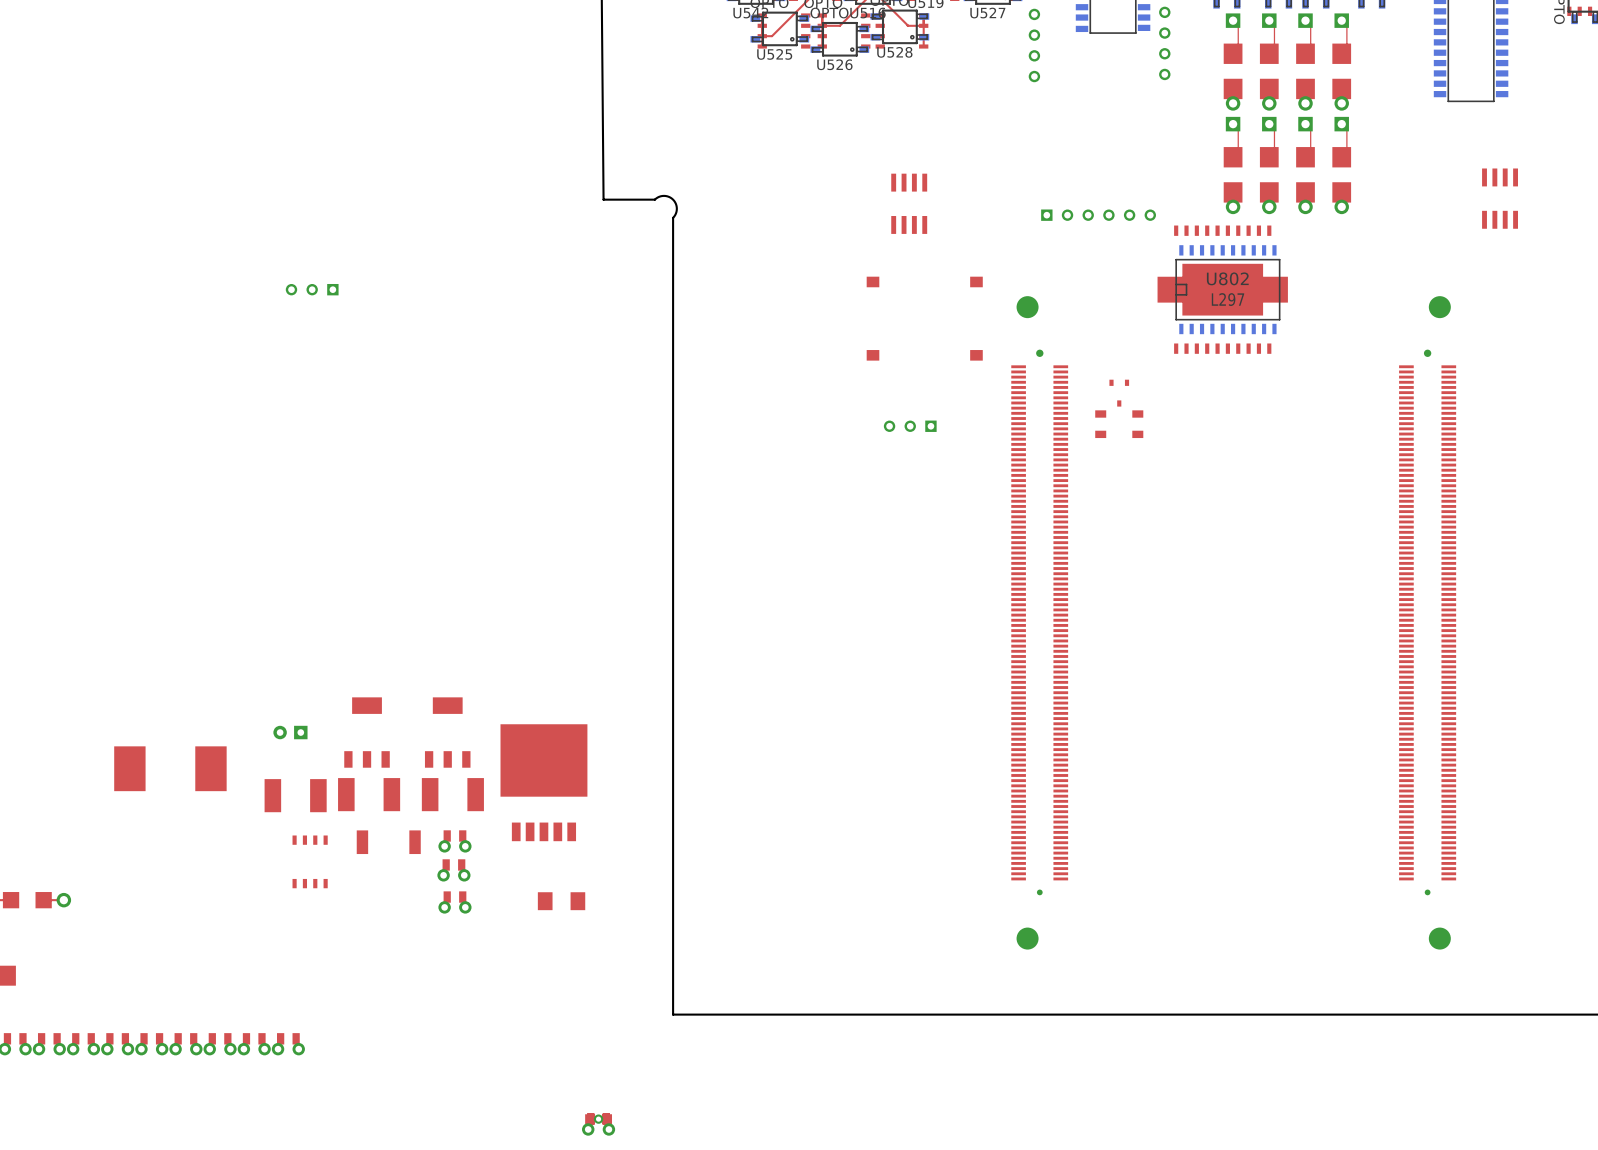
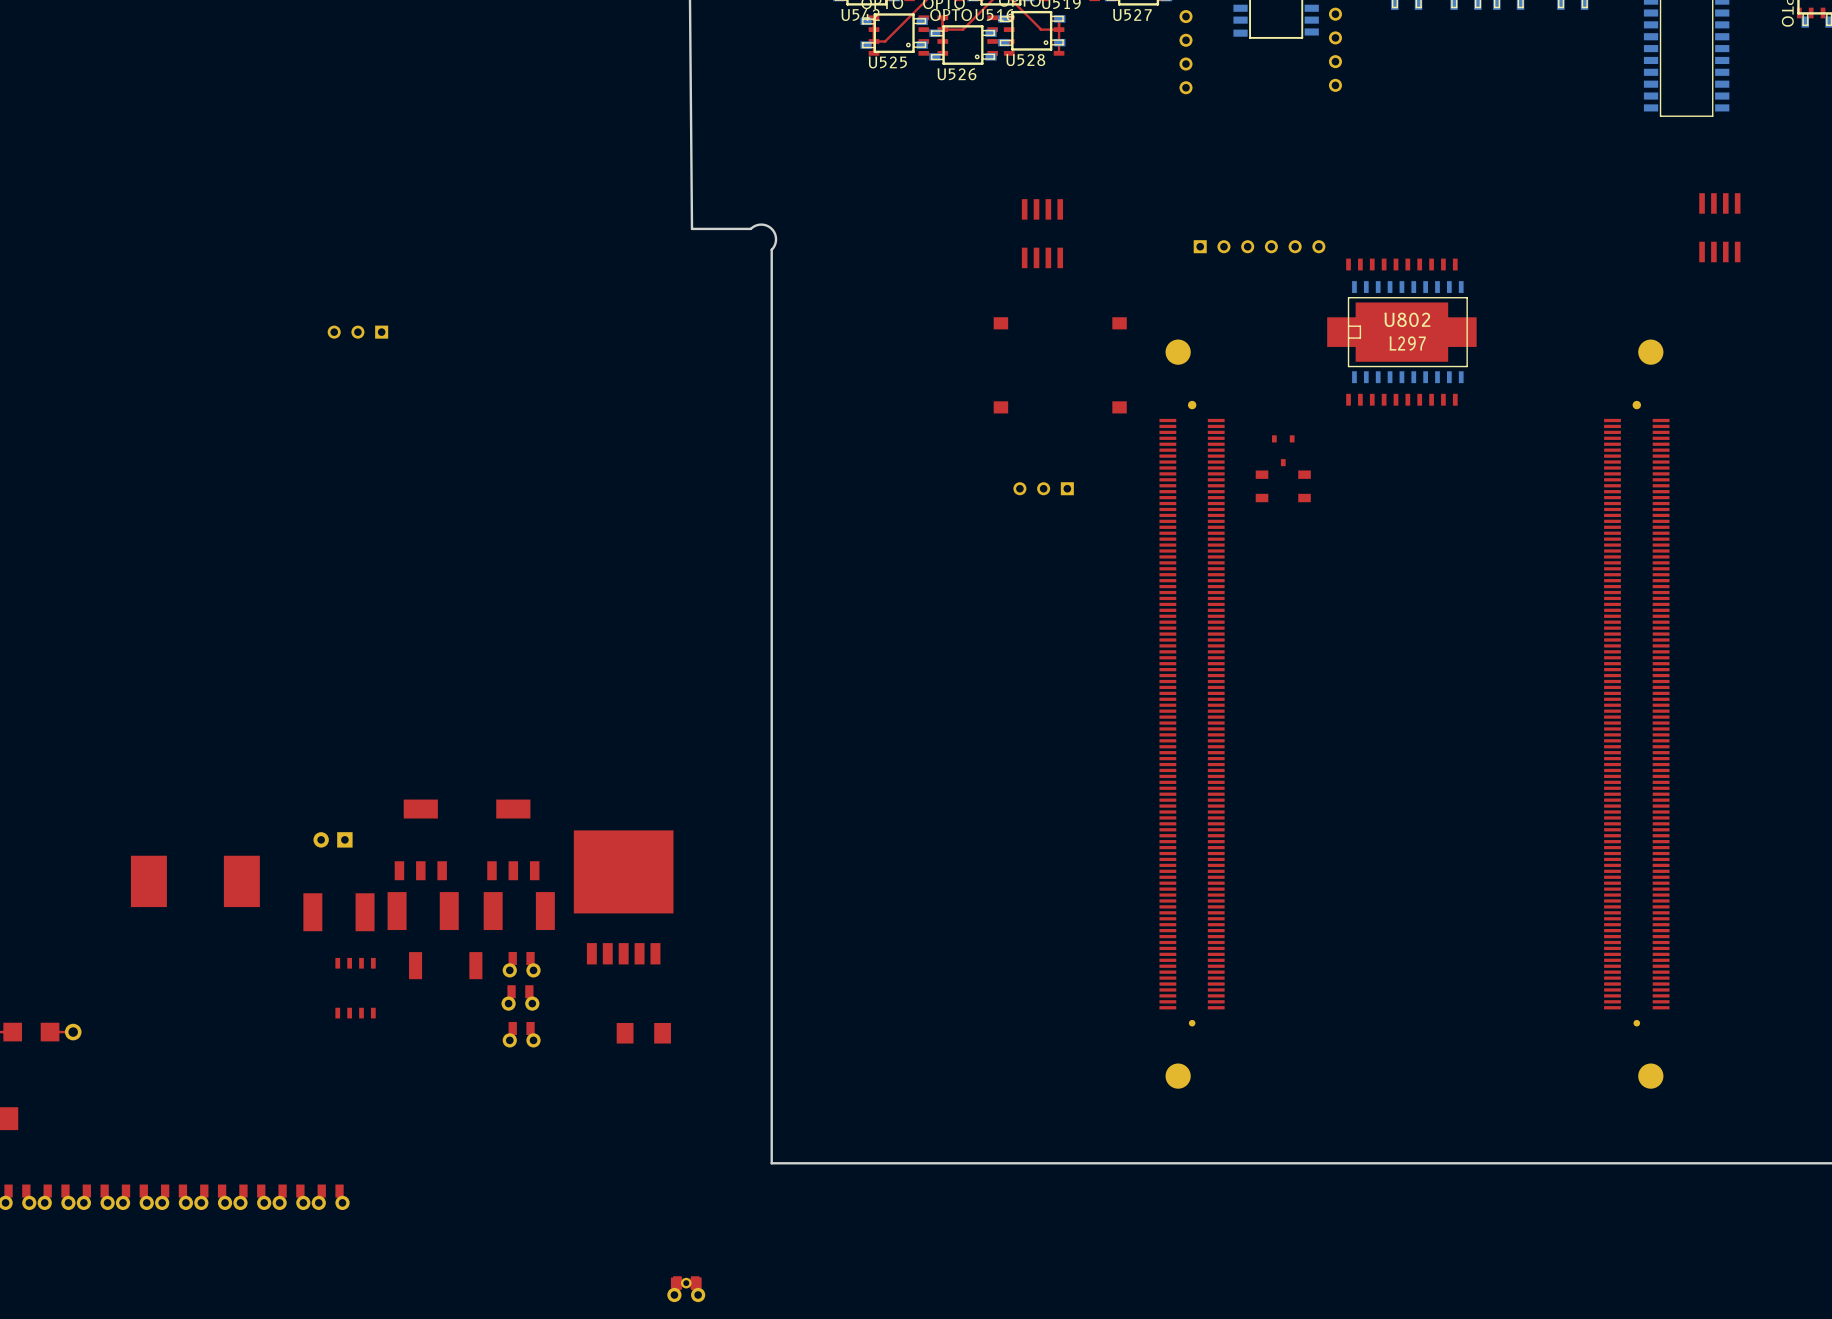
part: (1233, 62) -> none
part: (1269, 62) -> none
part: (1305, 62) -> none
part: (1341, 62) -> none
part: (1233, 165) -> none
part: (1269, 165) -> none
part: (1305, 165) -> none
part: (1341, 165) -> none

